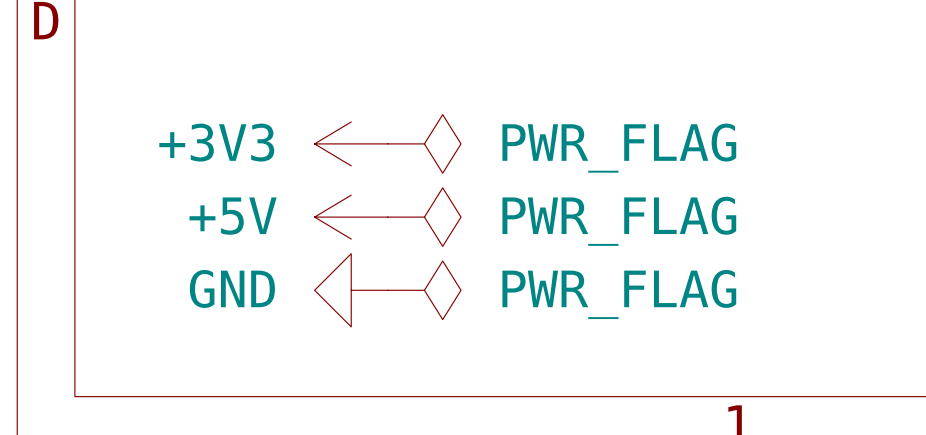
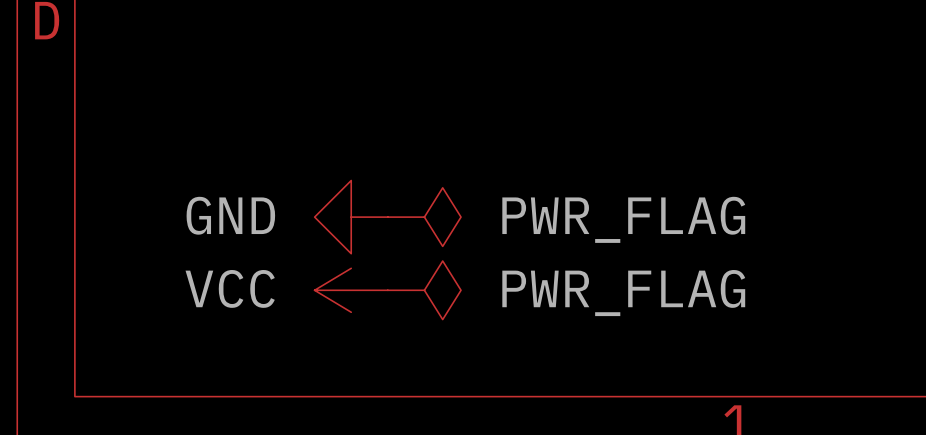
power symbol: +3V3 (351, 143) -> none
power symbol: PWR_FLAG (424, 143) -> none
power symbol: +5V (351, 217) -> GND (351, 217)
power symbol: GND (351, 290) -> VCC (351, 290)

